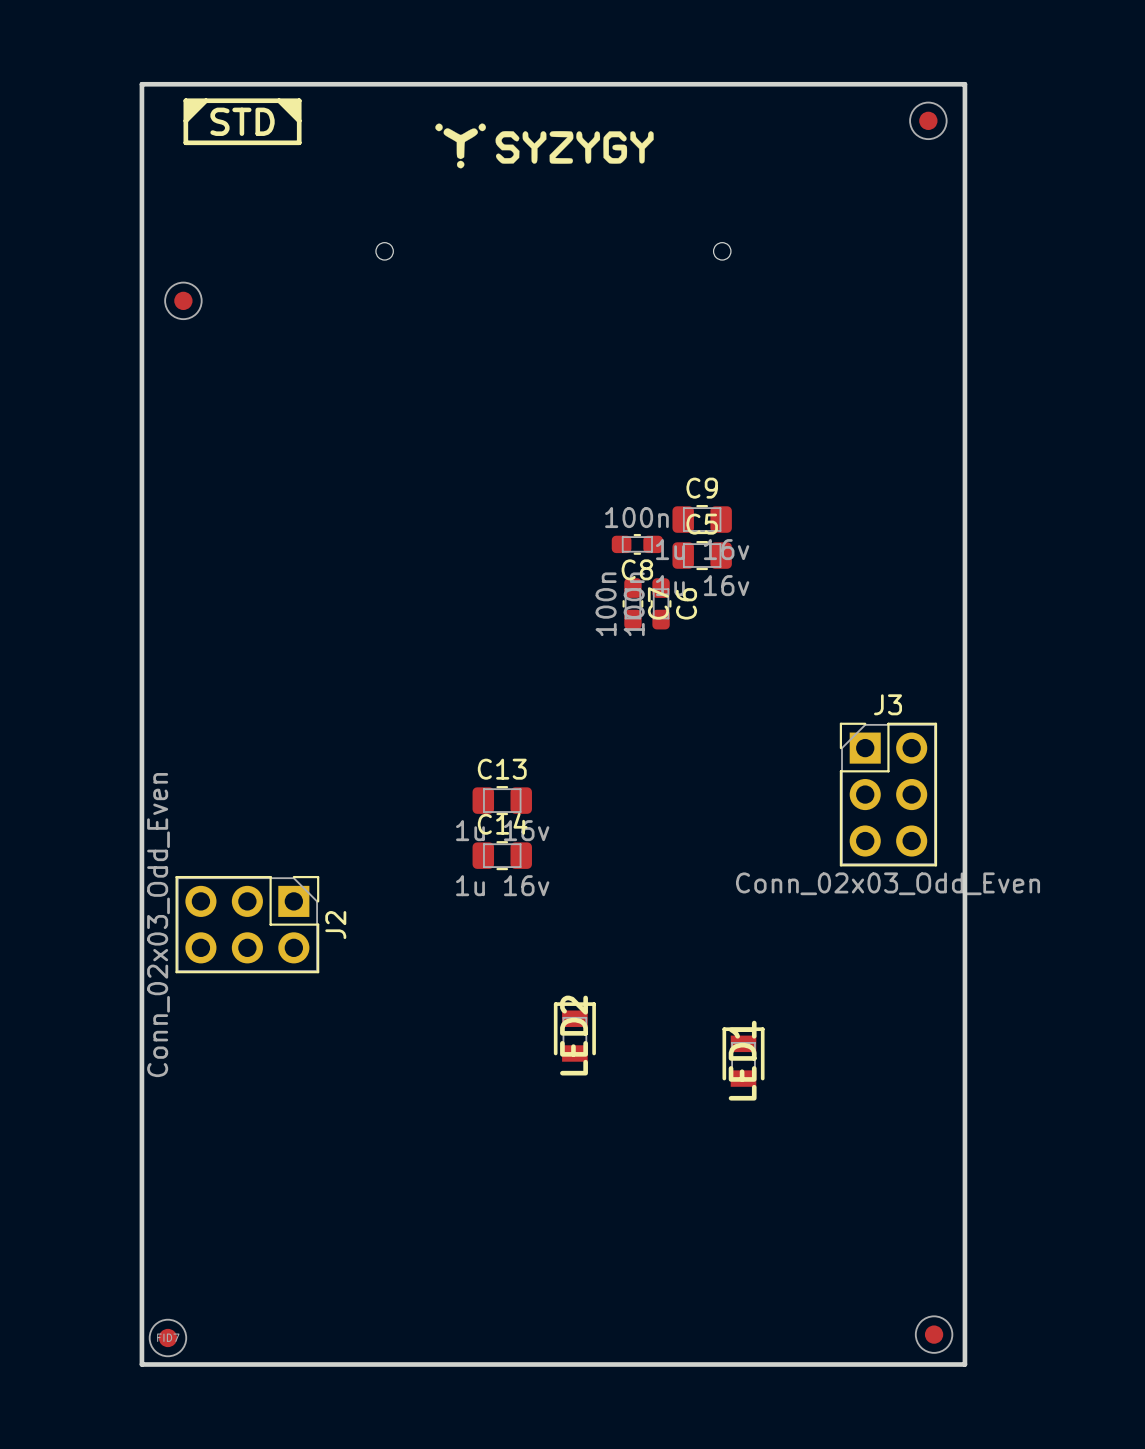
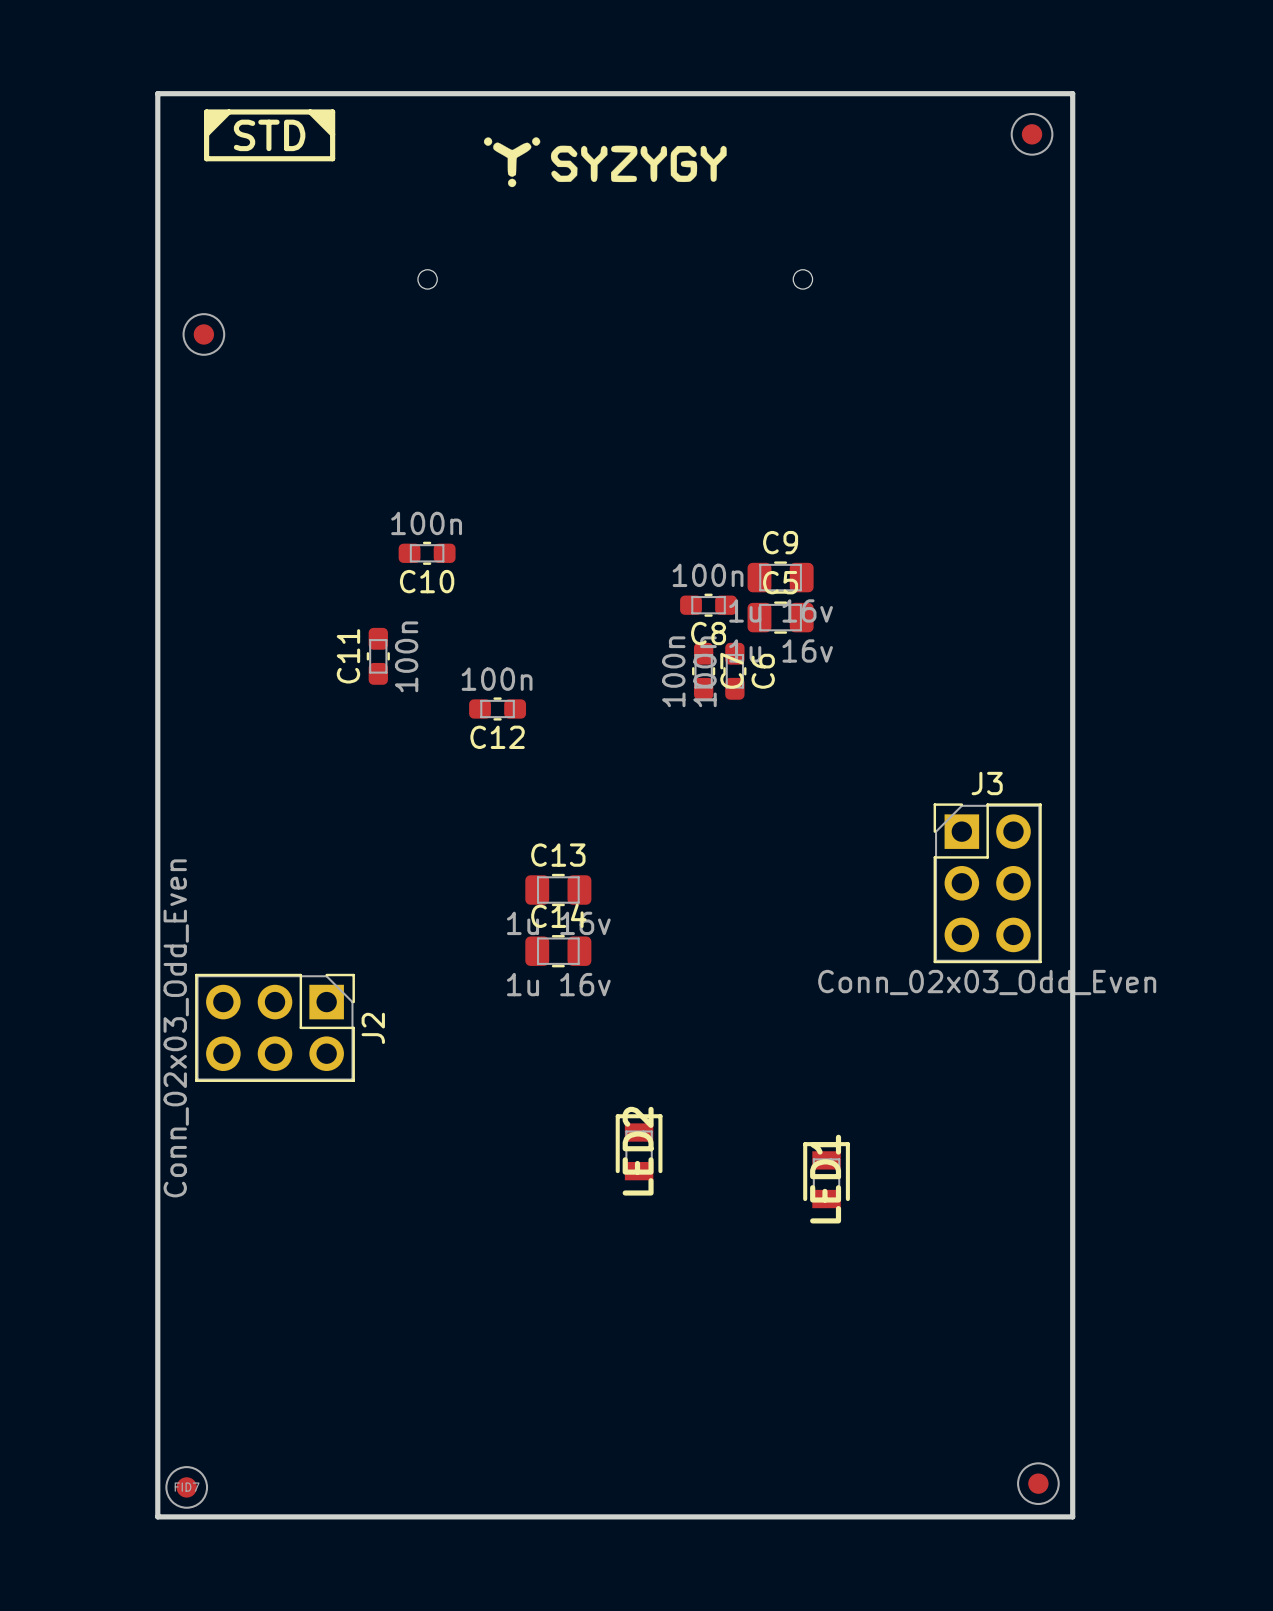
C10: none -> 100n (427, 553)
C11: none -> 100n (378, 656)
C12: none -> 100n (497, 708)

